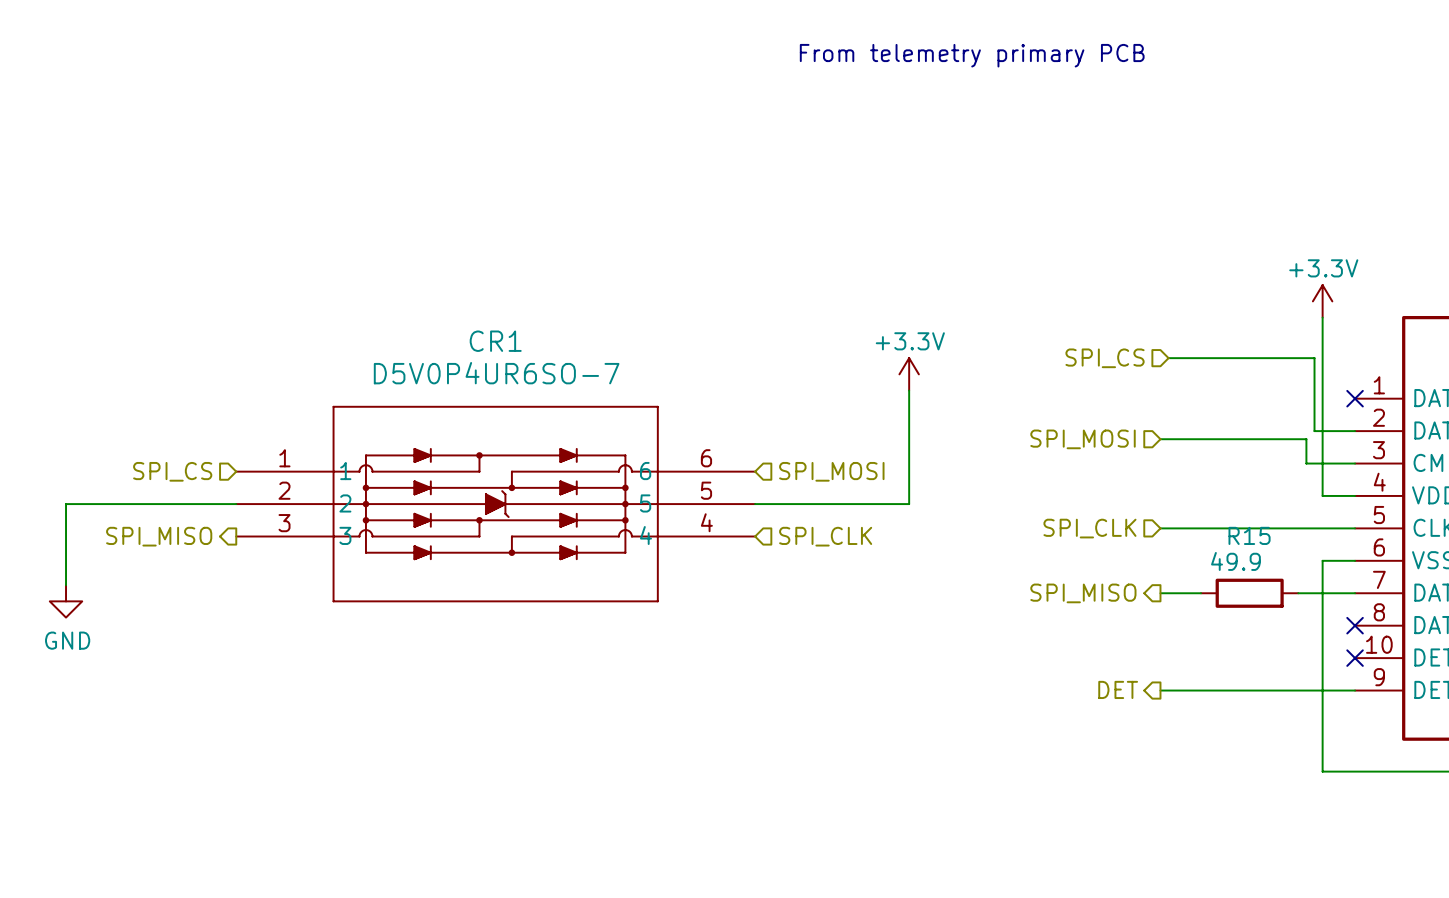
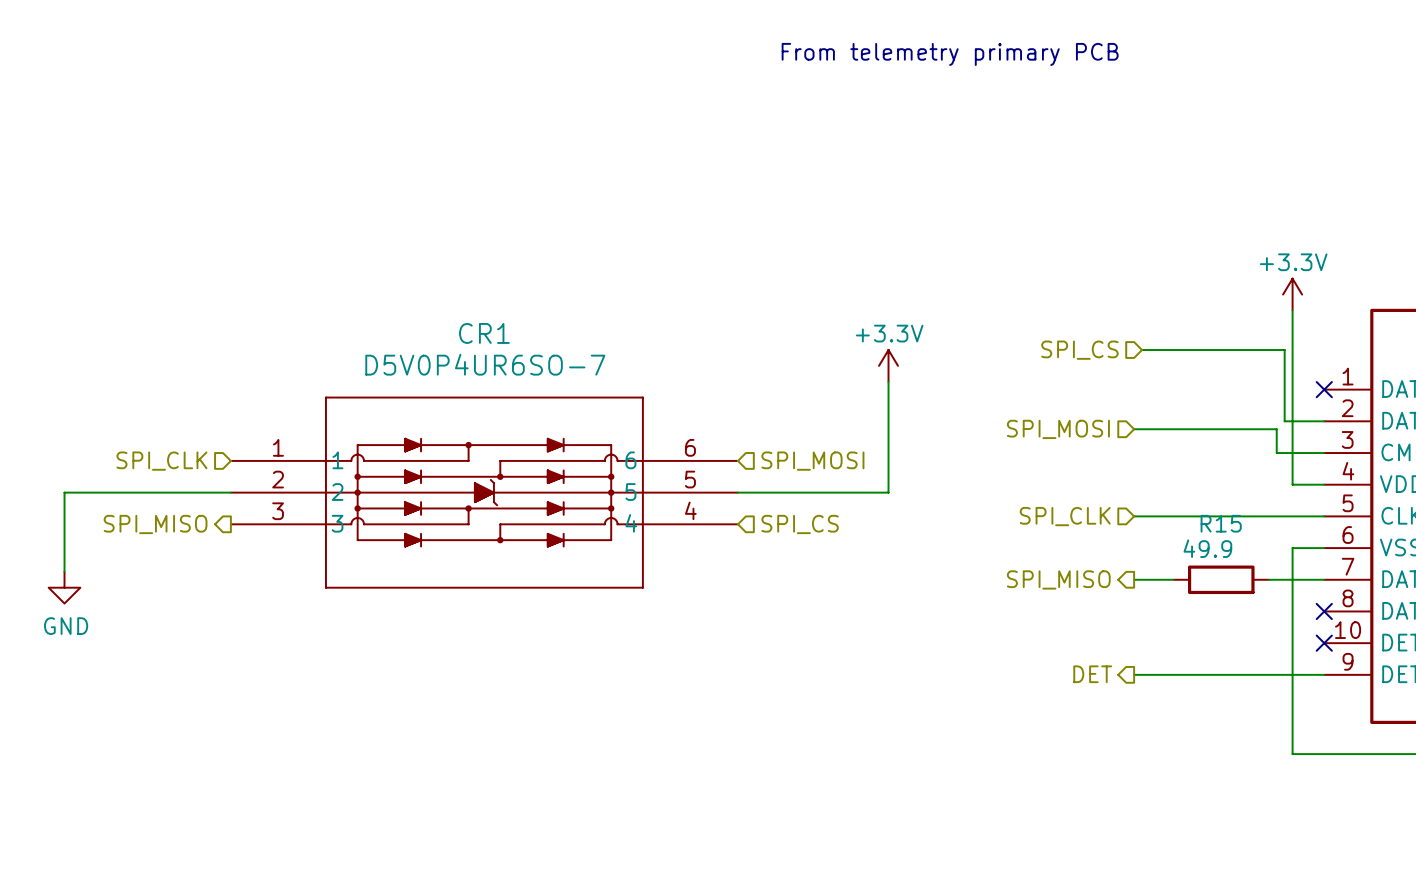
hierarchical label: SPI_CS (172, 471) -> SPI_CLK (161, 461)
hierarchical label: SPI_CLK (825, 536) -> SPI_CS (800, 524)

